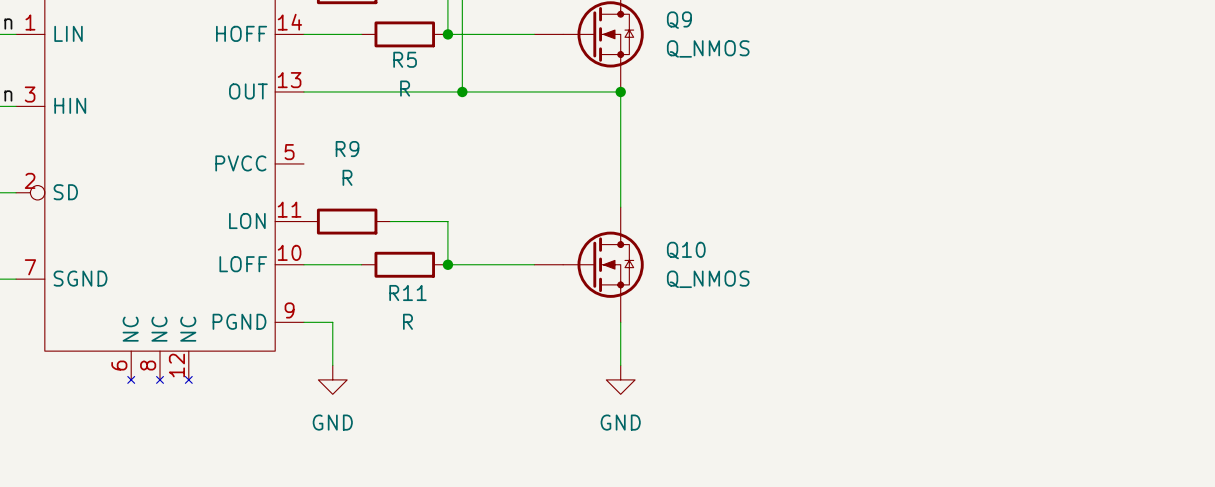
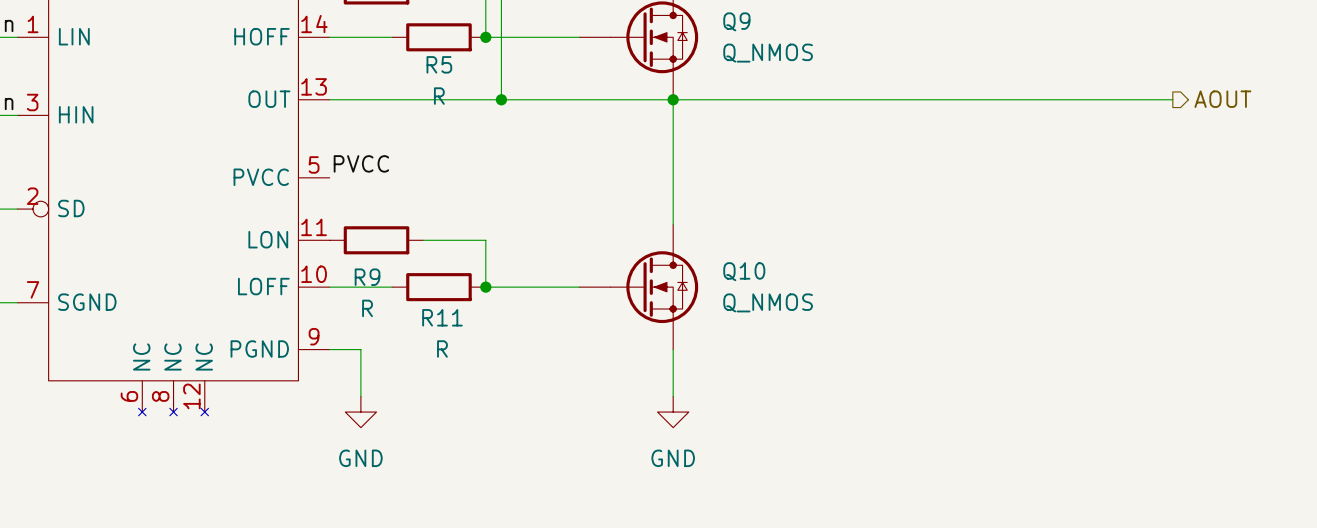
wire: none -> (673, 99) (1172, 99)
hierarchical label: none -> AOUT (1222, 99)
R9 name position: R9 (347, 149) -> R9 (367, 277)
label: none -> PVCC (361, 163)
R9 value position: R (347, 177) -> R (367, 308)

